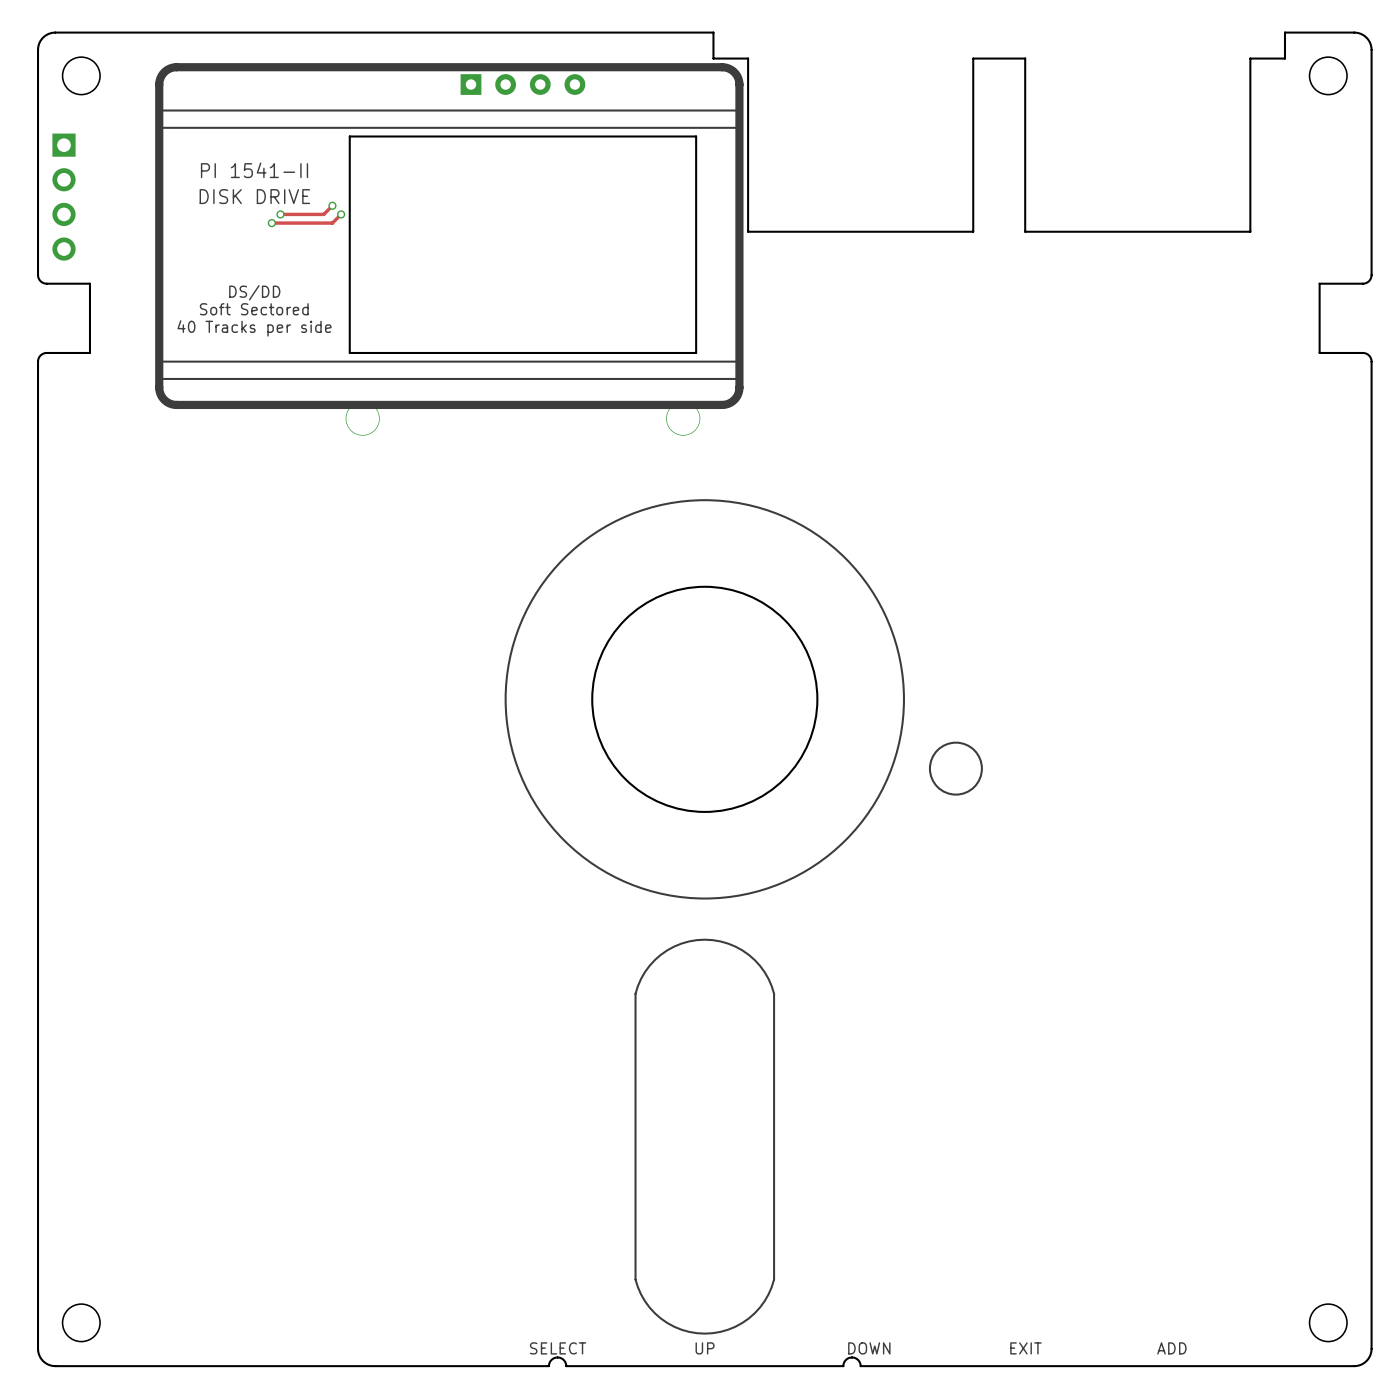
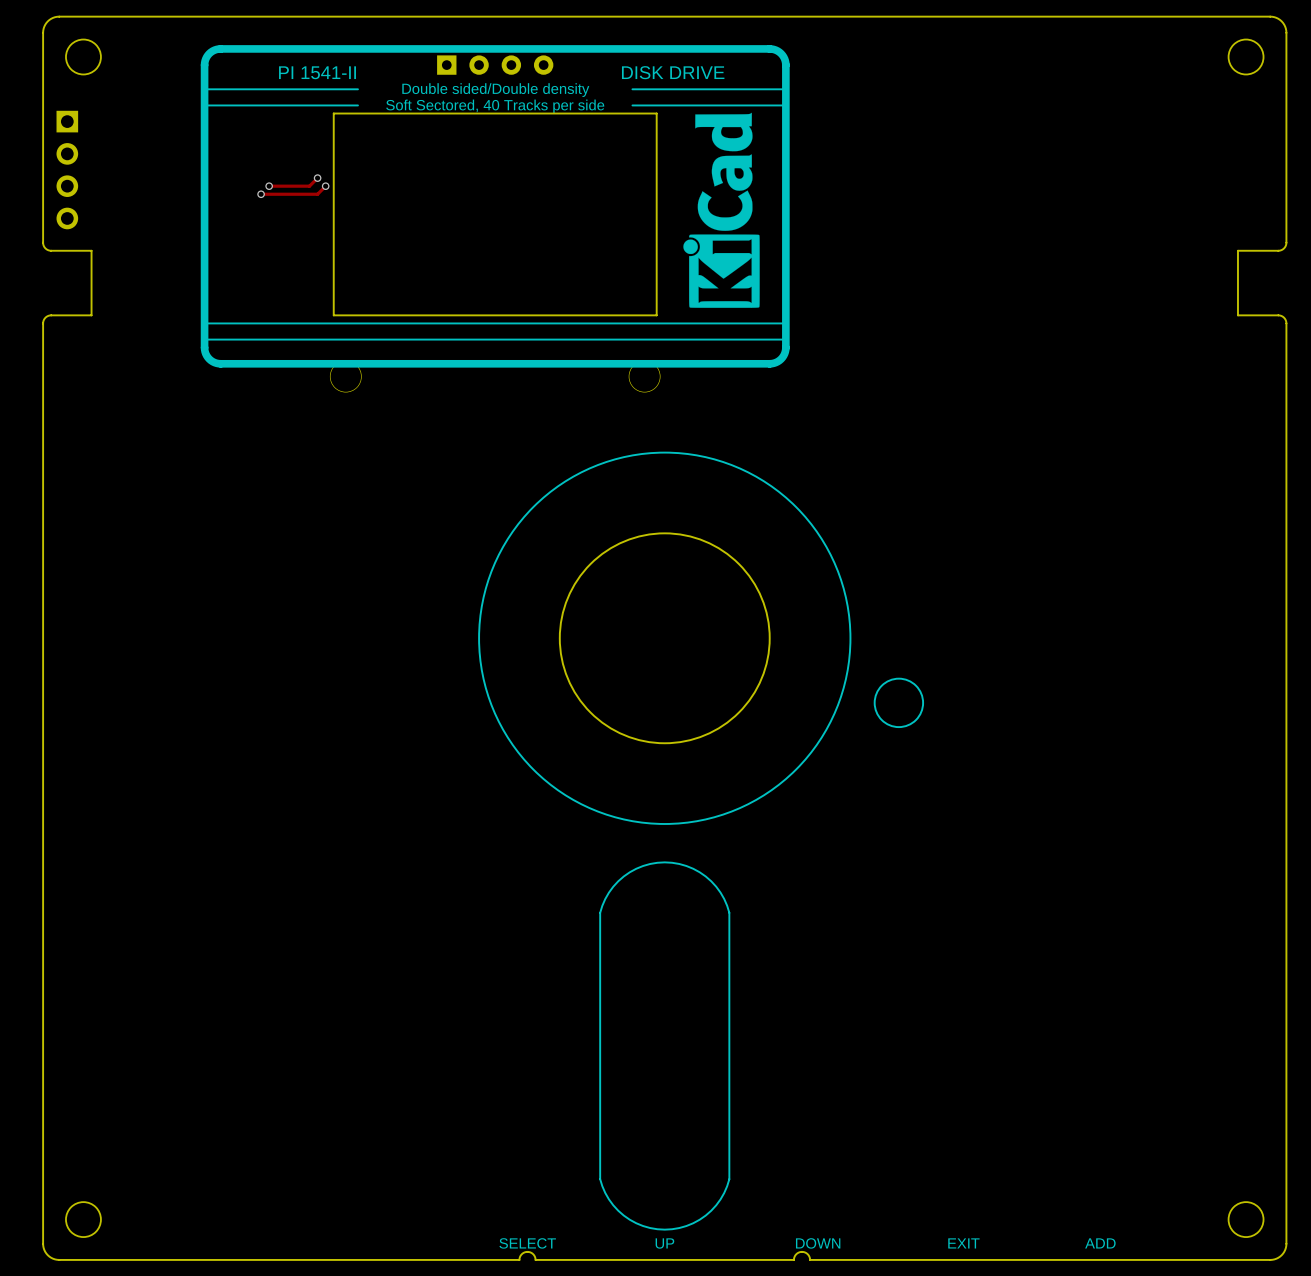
board edge: (713, 32) (713, 58) (748, 58) (748, 231) (973, 231) (973, 58) (1025, 58) (1025, 231) (1250, 231) (1250, 58) (1284, 58) (1284, 32) -> (672, 16) (1205, 16)
line: (228, 67) (172, 67) (162, 73) (159, 82) (159, 387) (164, 399) (176, 404) -> (220, 48) (209, 53) (204, 65) (204, 347) (209, 359) (220, 363)
line: (722, 67) (734, 72) (739, 84) (739, 387) (734, 399) (722, 404) -> (680, 48) (771, 49) (781, 53) (785, 65) (784, 353) (779, 360) (771, 363) (680, 363)
text: none -> DISK DRIVE (673, 72)
line: (159, 110) (211, 110) -> none
line: (375, 110) (670, 110) -> none
line: none -> (697, 89) (785, 89)
text: none -> Double sided/Double density (495, 90)
line: (159, 127) (211, 127) -> none
line: (375, 127) (670, 127) -> none
line: none -> (697, 105) (785, 105)
text: none -> Soft Sectored, 40 Tracks per side (495, 106)
drawing: none -> [683, 112, 760, 308]
text position: PI 1541-II (254, 170) -> PI 1541-II (317, 72)
text: DISK DRIVE (254, 196) -> none
text: DS/DD (254, 292) -> none
text: Soft Sectored (254, 309) -> none
text: 40 Tracks per side (254, 328) -> none
line: (159, 361) (211, 361) -> none
line: none -> (697, 323) (785, 323)
line: (159, 378) (211, 378) -> none
line: none -> (697, 339) (785, 339)
line: (176, 404) (228, 404) -> none

